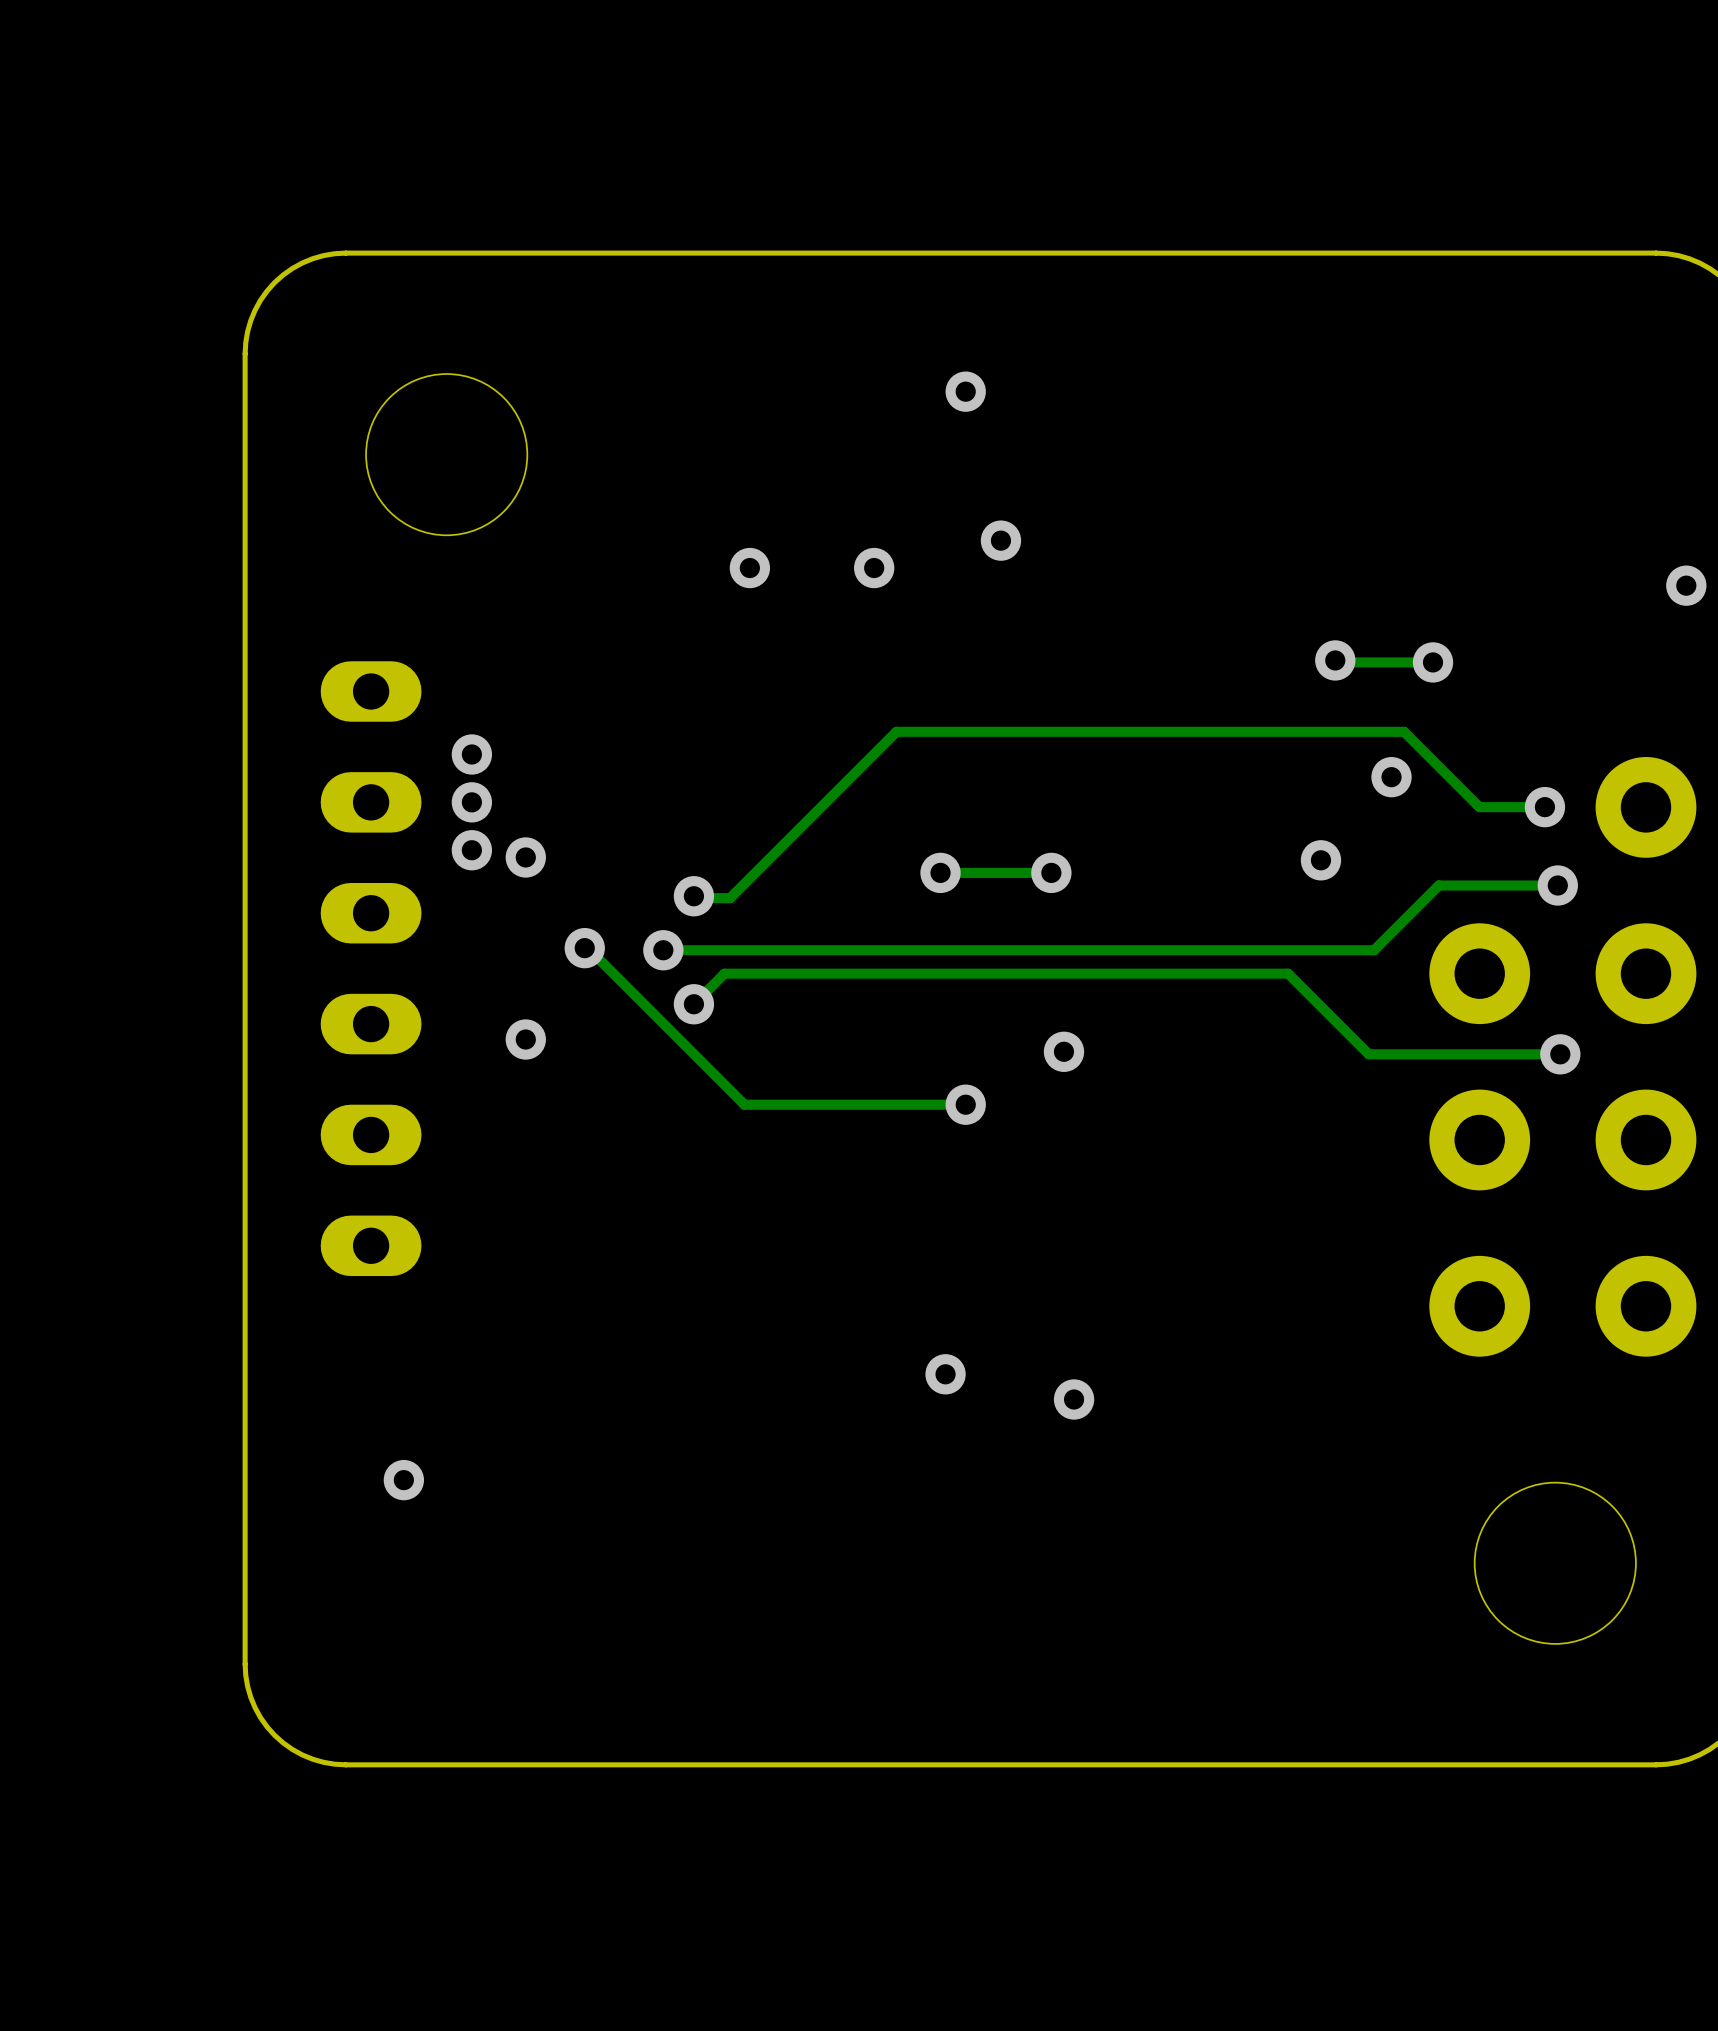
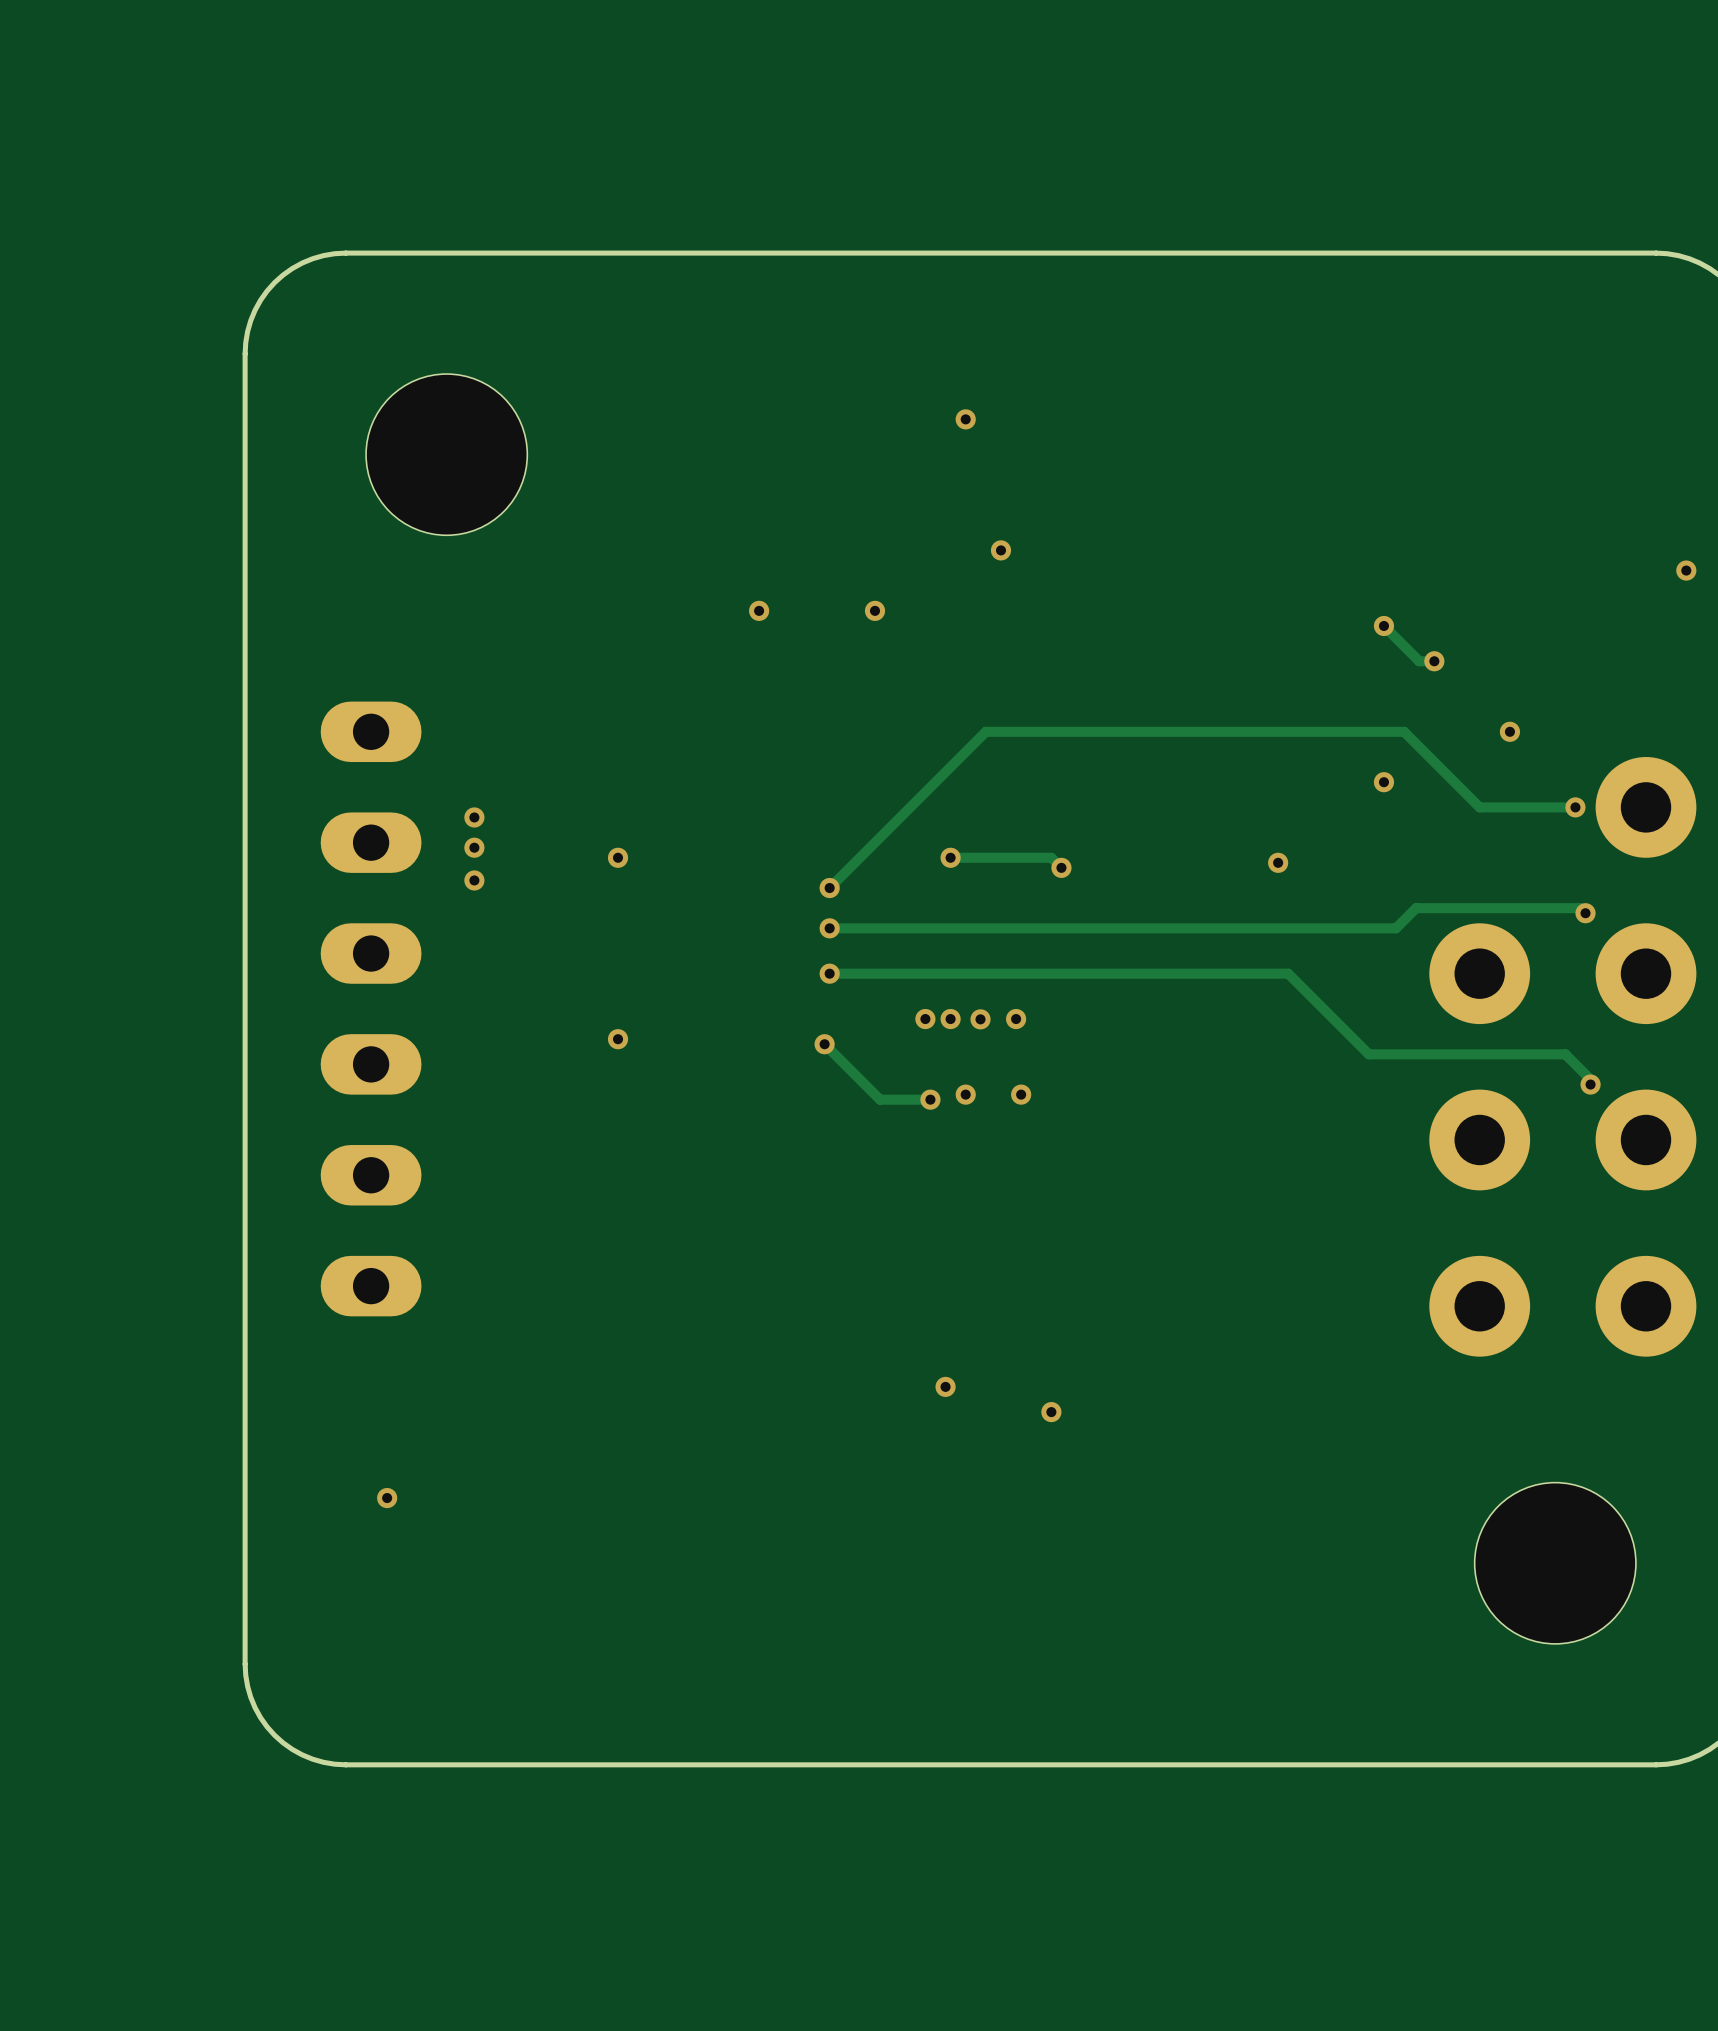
via size: [945, 371, 986, 412] -> [955, 409, 976, 430]
via size: [980, 520, 1022, 561] -> [990, 540, 1012, 561]
via size: [1666, 565, 1707, 606] -> [1676, 560, 1697, 581]
via: (749, 568) -> none
via: (874, 568) -> none
via: none -> (759, 610)
via: none -> (875, 610)
via: none -> (1383, 625)
via size: [1412, 642, 1454, 683] -> [1424, 651, 1445, 672]
track: (1335, 660) (1337, 662) (1433, 662) -> (1383, 625) (1419, 661) (1434, 661)
via: (1335, 660) -> none
track: (985, 731) (896, 731) (730, 898) (695, 898) (693, 896) -> (985, 731) (829, 888)
via: none -> (1509, 731)
via: (471, 754) -> none
via size: [1371, 757, 1412, 798] -> [1373, 772, 1395, 793]
via size: [451, 782, 493, 823] -> [464, 807, 485, 828]
track: (1544, 807) (1479, 807) -> (1575, 807) (1479, 807)
via: (1544, 807) -> none
via: none -> (1575, 807)
via size: [451, 830, 493, 871] -> [464, 837, 485, 858]
via size: [920, 852, 961, 894] -> [940, 847, 961, 868]
via size: [1031, 852, 1072, 894] -> [1051, 857, 1072, 878]
via: (525, 857) -> none
via: none -> (618, 857)
track: none -> (950, 857) (1051, 857) (1061, 867)
via: (1320, 860) -> none
via: none -> (1278, 862)
via size: [1537, 865, 1578, 906] -> [1575, 903, 1596, 924]
track: (1051, 872) (940, 872) -> none
via: none -> (474, 880)
track: (1557, 885) (1438, 885) (1416, 908) -> (1585, 913) (1580, 908) (1416, 908)
via: none -> (829, 888)
via: (693, 896) -> none
via: none -> (829, 928)
track: (1395, 928) (1374, 950) (663, 950) -> (1395, 928) (829, 928)
via: (584, 948) -> none
track: (597, 948) (597, 958) (744, 1104) (965, 1104) -> none
via: (663, 950) -> none
part position: (371, 968) -> (371, 1008)
track: (829, 973) (724, 973) (693, 1004) -> none
via: none -> (829, 973)
via: (693, 1004) -> none
via: none -> (925, 1019)
via: none -> (950, 1019)
via: none -> (980, 1019)
via: none -> (1016, 1019)
via: (525, 1039) -> none
via: none -> (618, 1039)
track: none -> (824, 1044) (880, 1099) (930, 1099)
via: none -> (824, 1044)
via: (1063, 1051) -> none
track: none -> (1560, 1054) (1565, 1054) (1590, 1079) (1590, 1084)
via position: (1560, 1054) -> (1590, 1084)
via size: [945, 1084, 986, 1125] -> [955, 1084, 976, 1105]
via: none -> (1021, 1094)
via: none -> (930, 1099)
via size: [925, 1354, 966, 1395] -> [935, 1376, 956, 1397]
via size: [1053, 1379, 1095, 1420] -> [1041, 1402, 1062, 1423]
via size: [383, 1459, 425, 1501] -> [377, 1487, 398, 1509]

